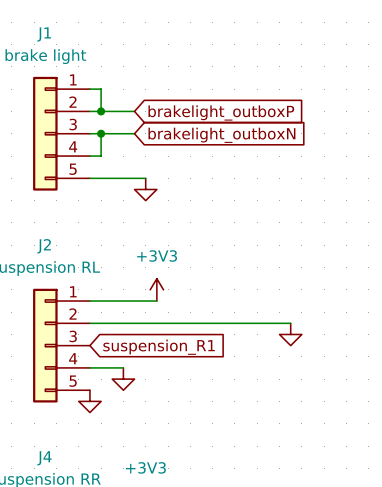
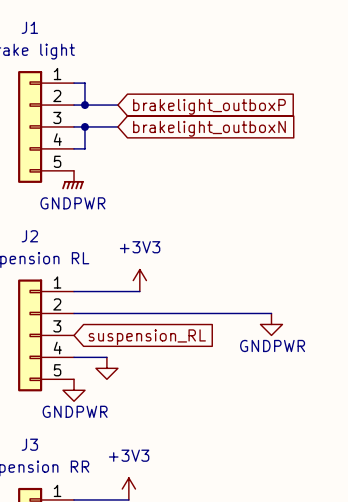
wire: (89, 178) (145, 178) -> none
power symbol: none -> GNDPWR (72, 180)
power symbol: (145, 189) -> none
global label: suspension_R1 (159, 347) -> suspension_RL (147, 337)
power symbol text: none -> GNDPWR (272, 345)
power symbol text: none -> GNDPWR (75, 411)
J4 name: J4 (44, 458) -> J3 (29, 444)

